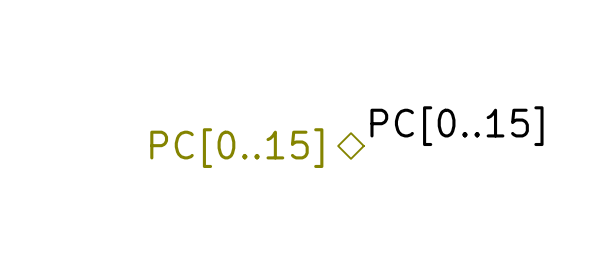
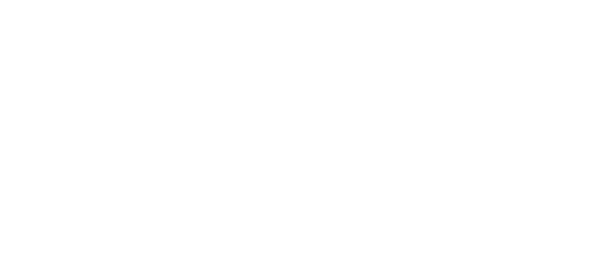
label: PC[0..15] (456, 126) -> none
hierarchical label: PC[0..15] (236, 148) -> none

